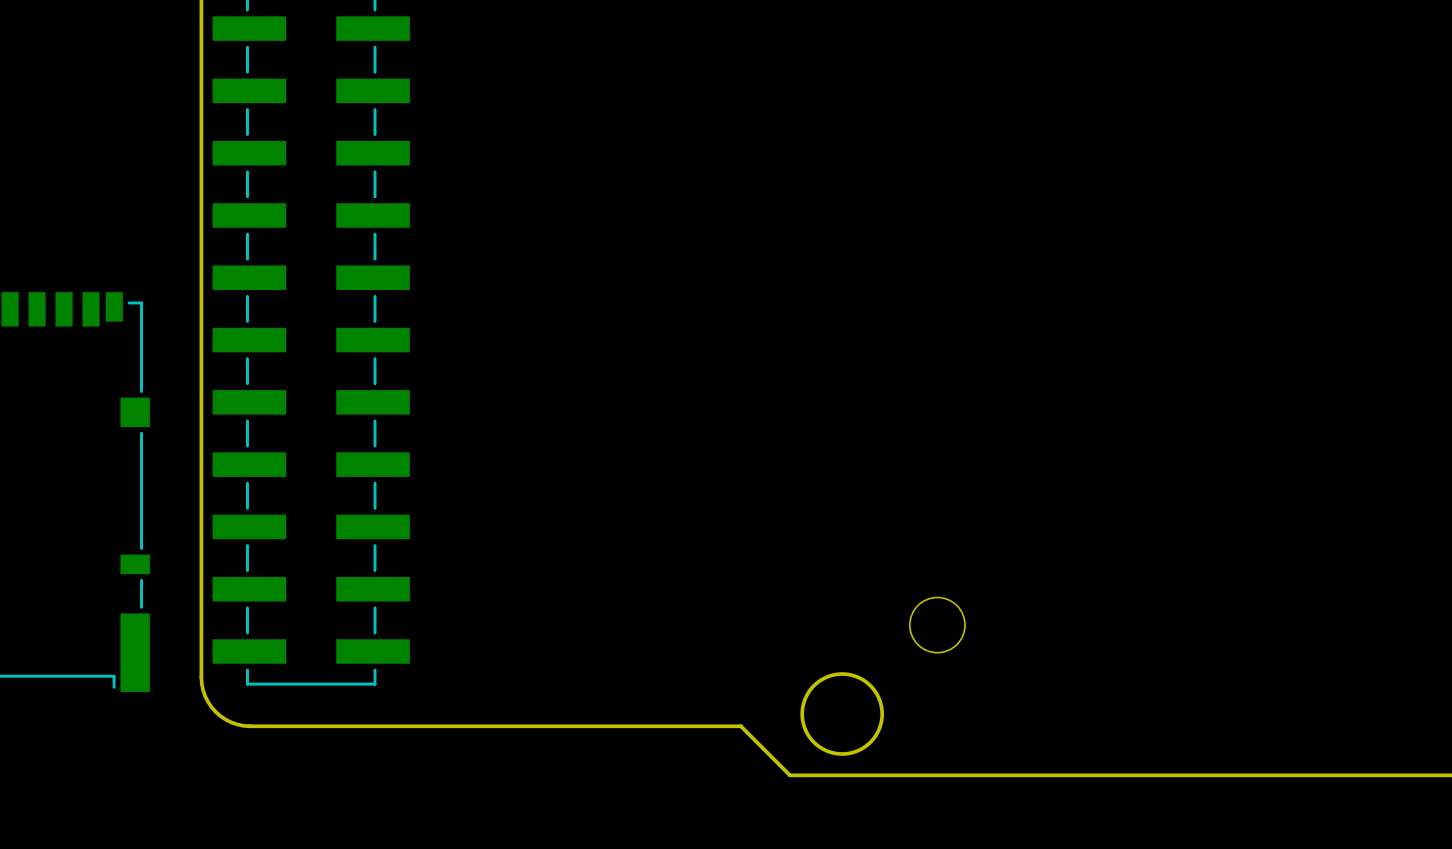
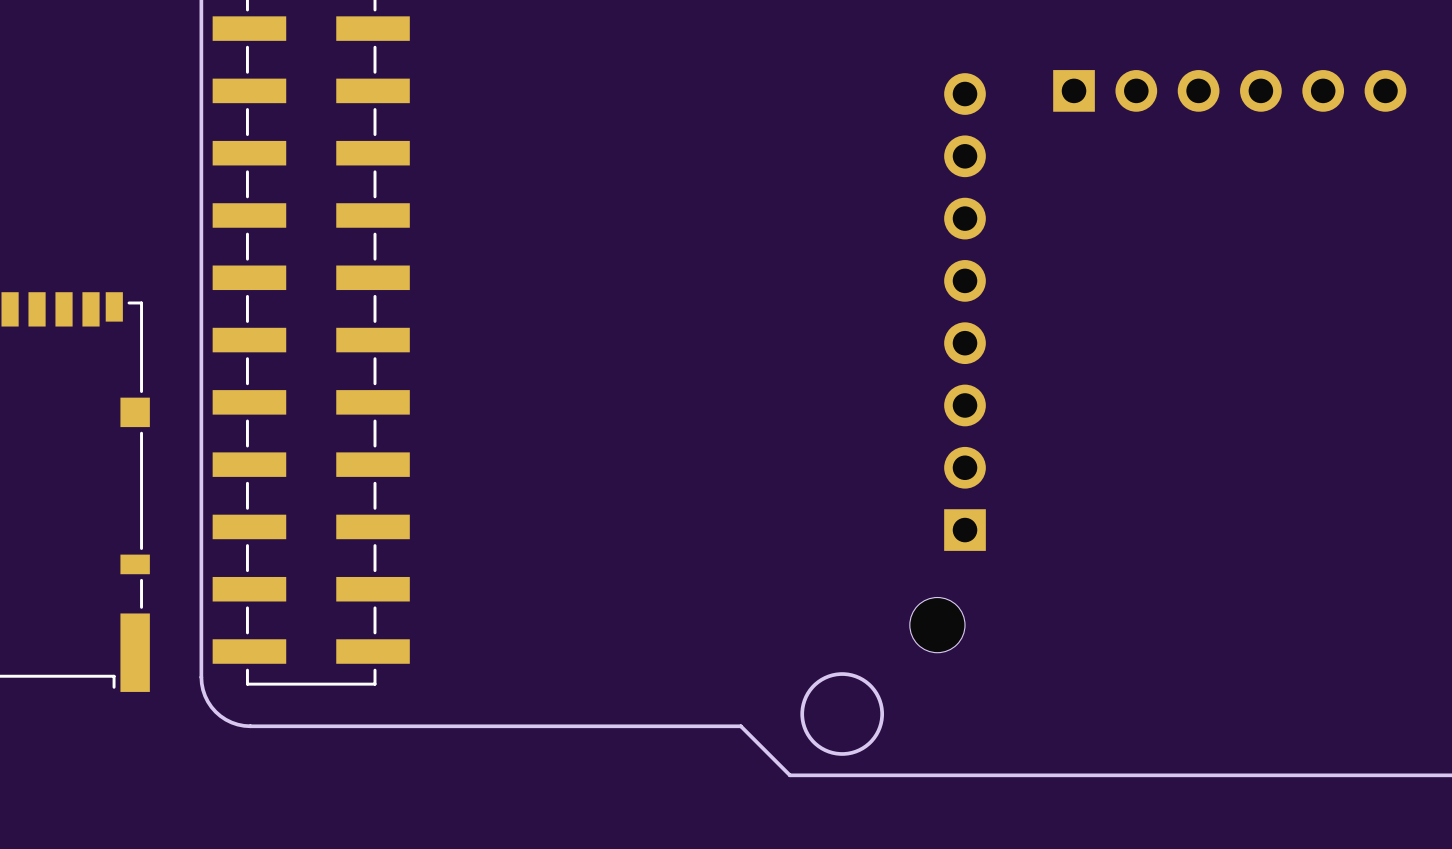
part: none -> (1229, 90)
part: none -> (965, 312)

